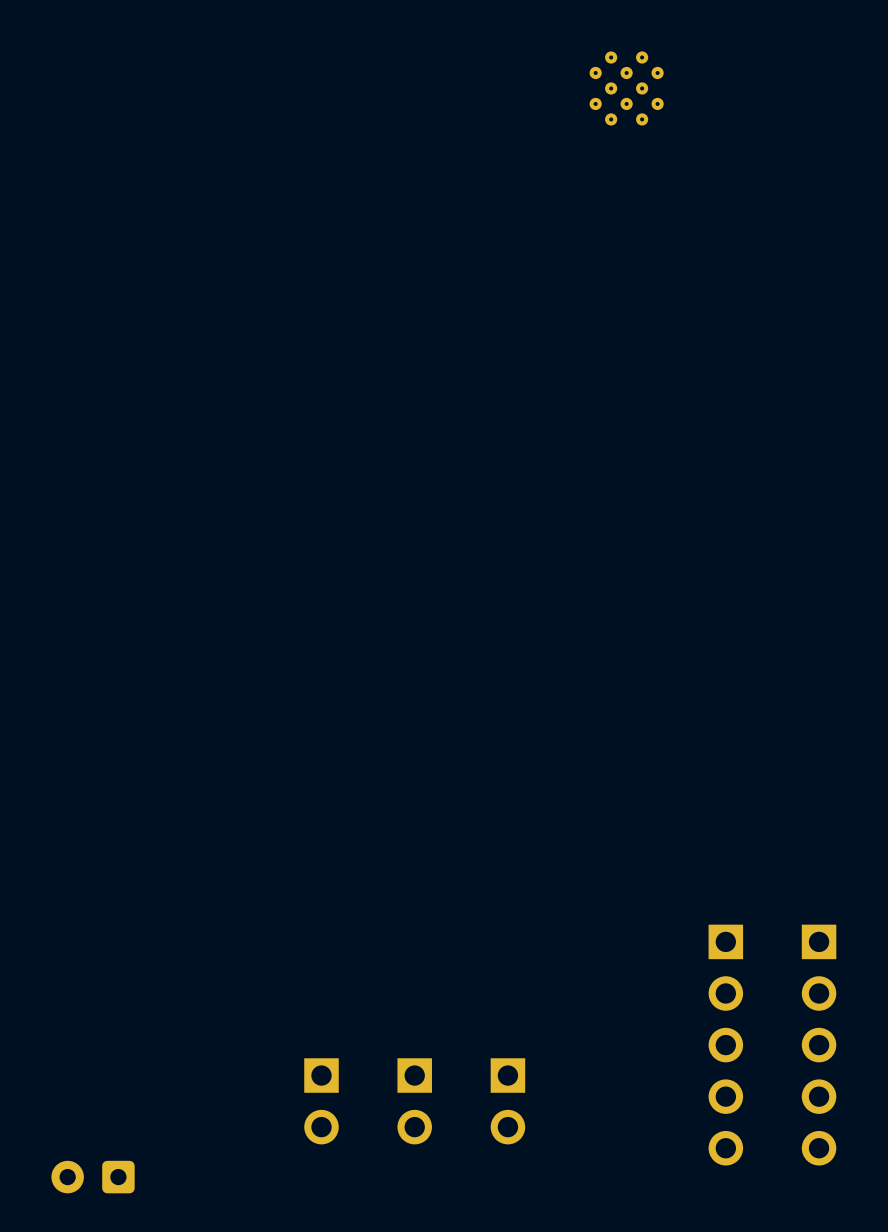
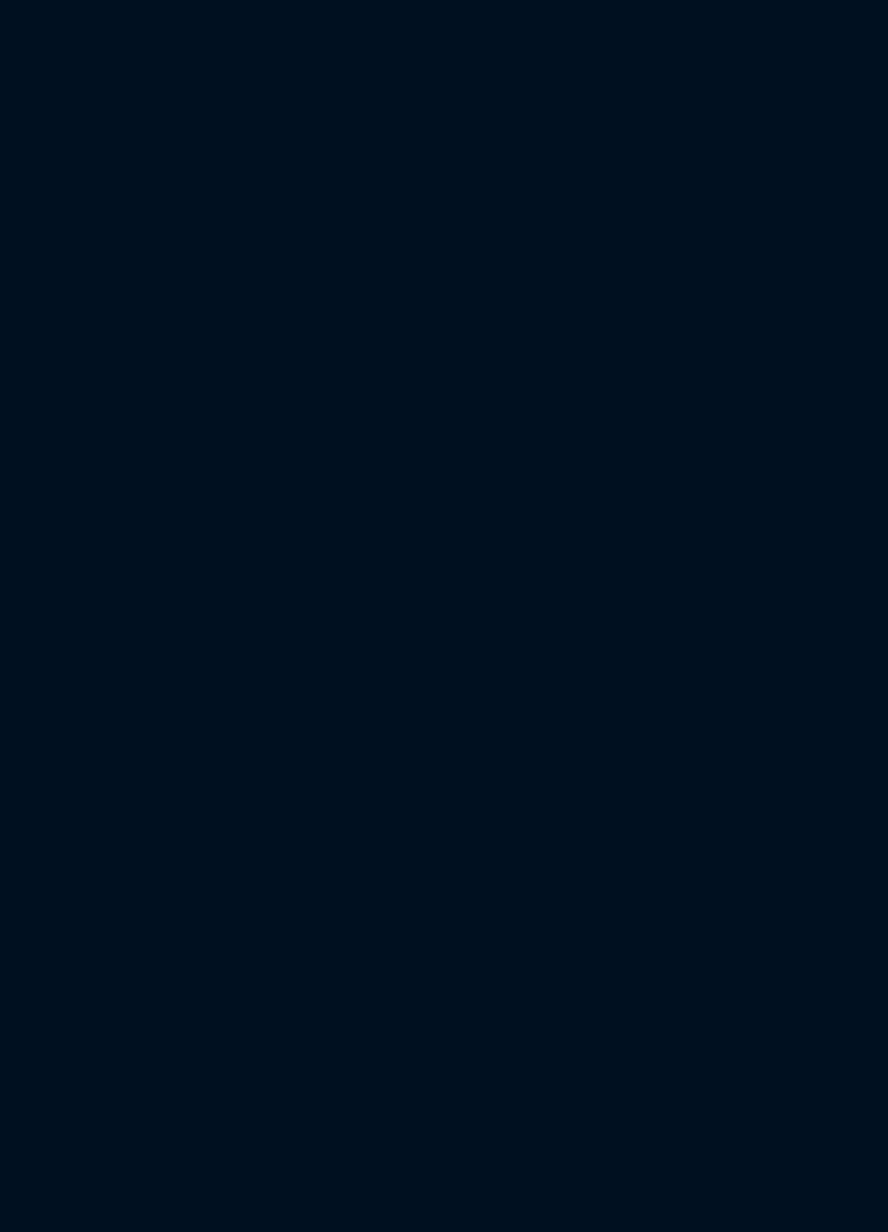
part: (626, 88) -> none
part: (725, 1045) -> none
part: (819, 1045) -> none
part: (321, 1101) -> none
part: (414, 1101) -> none
part: (507, 1101) -> none
part: (93, 1177) -> none

